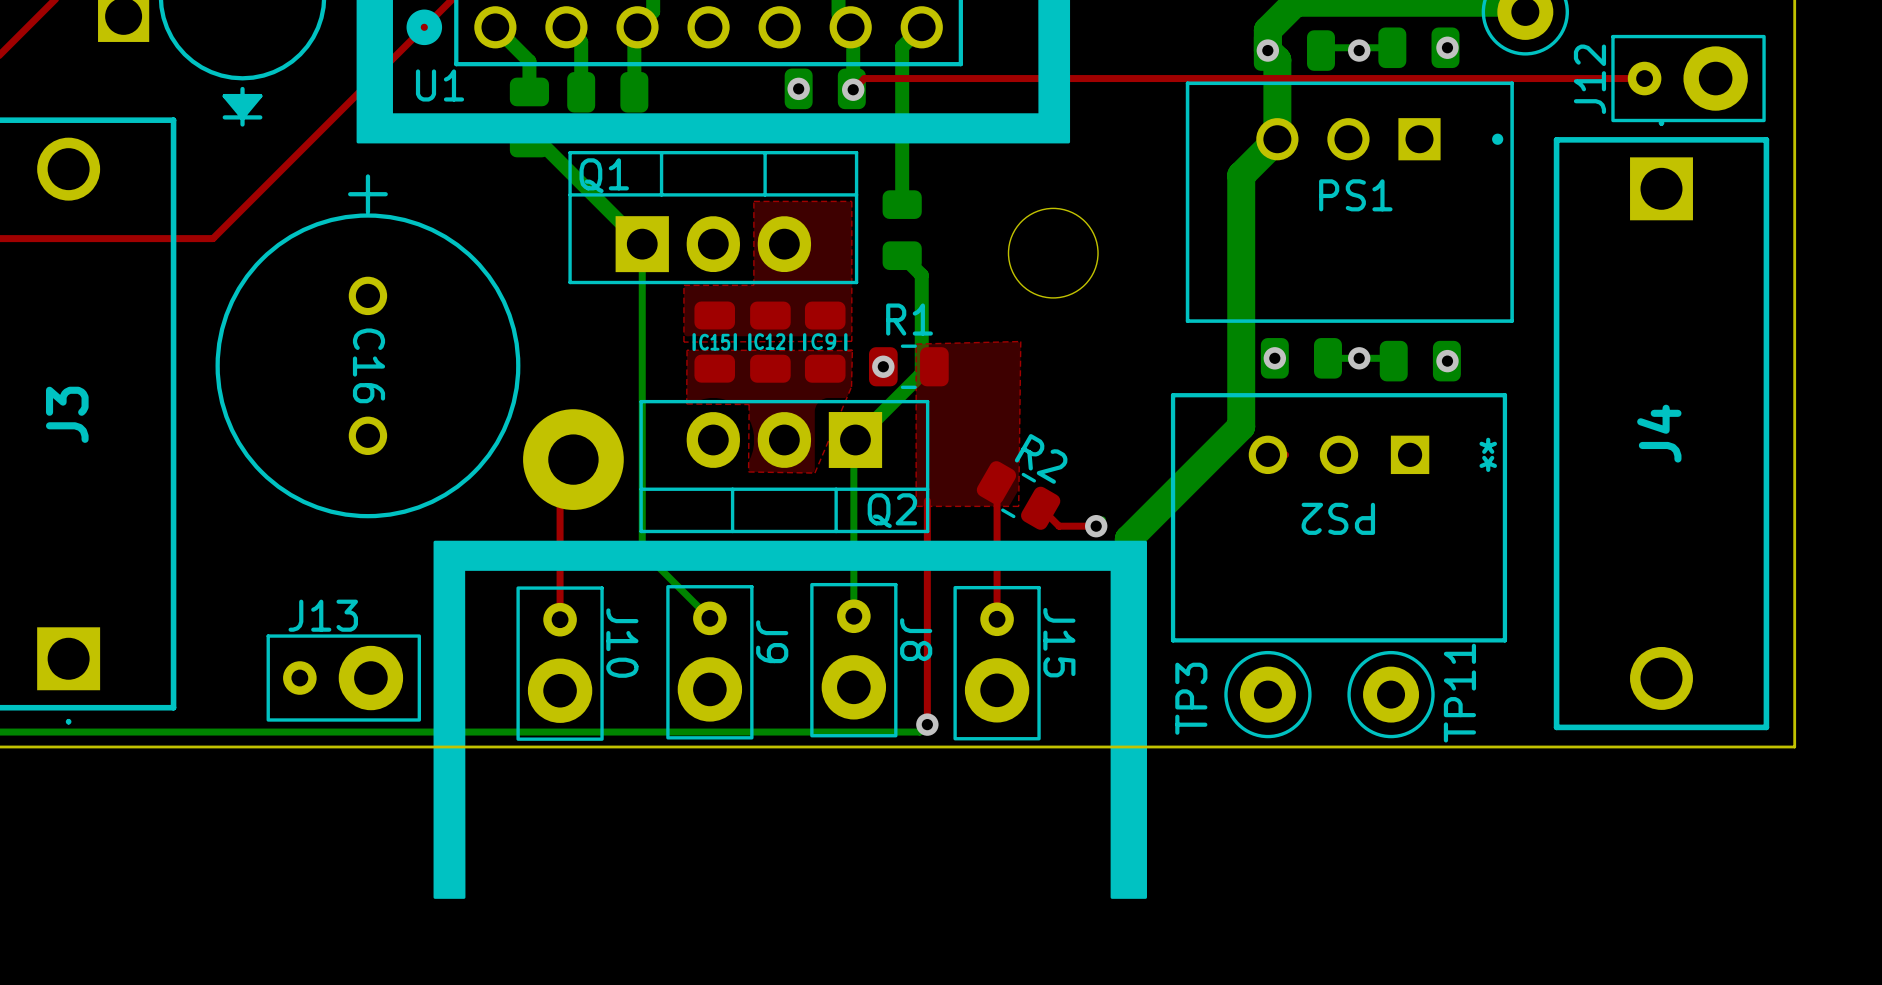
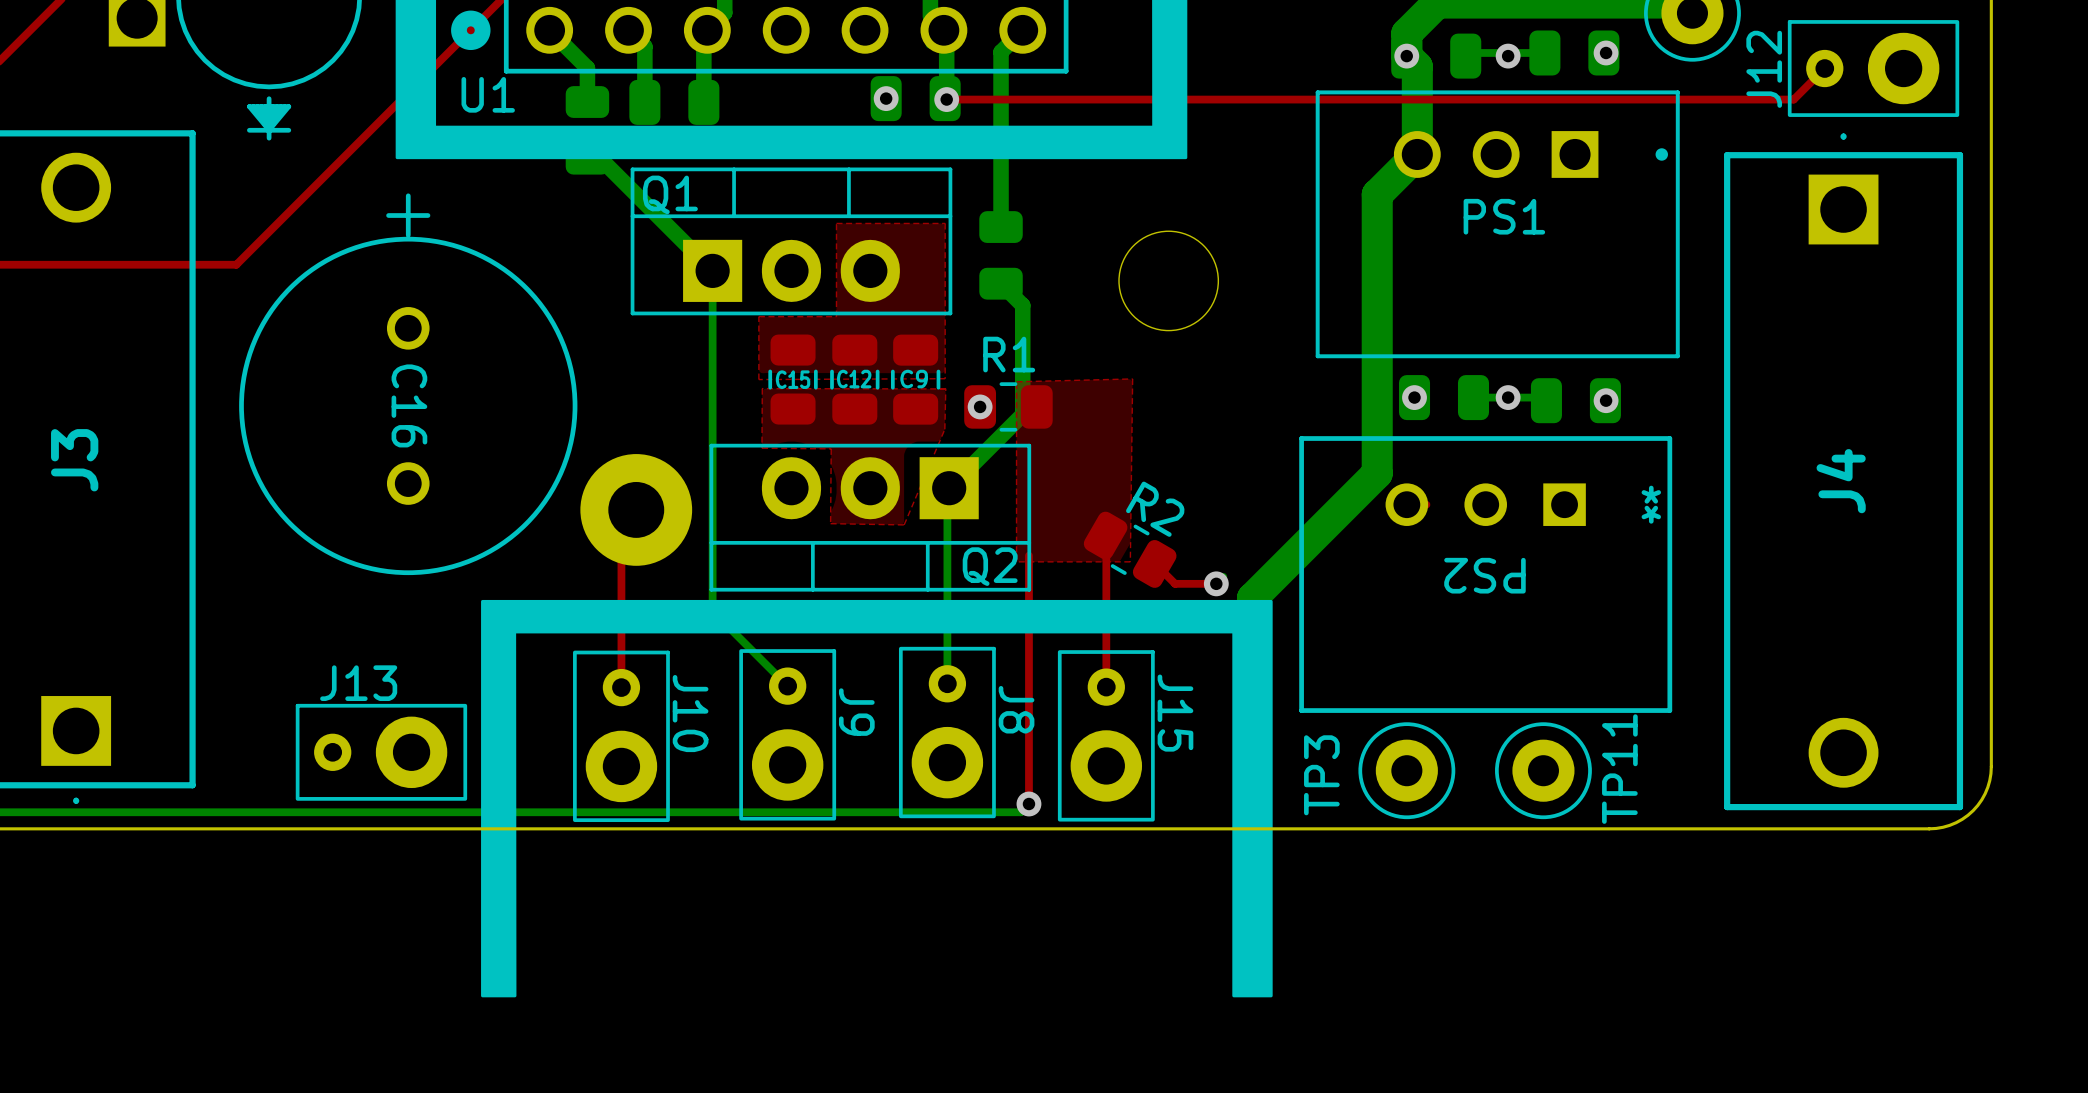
top track: (1644, 78) (864, 78) (853, 89) -> (1824, 68) (1793, 99) (946, 99)
J12 position: (1688, 78) -> (1873, 68)
board edge: (1794, 691) (1794, 746) (1738, 746) -> (1991, 766) (1989, 780) (1985, 793) (1973, 810) (1956, 822) (1943, 827) (1929, 828)

